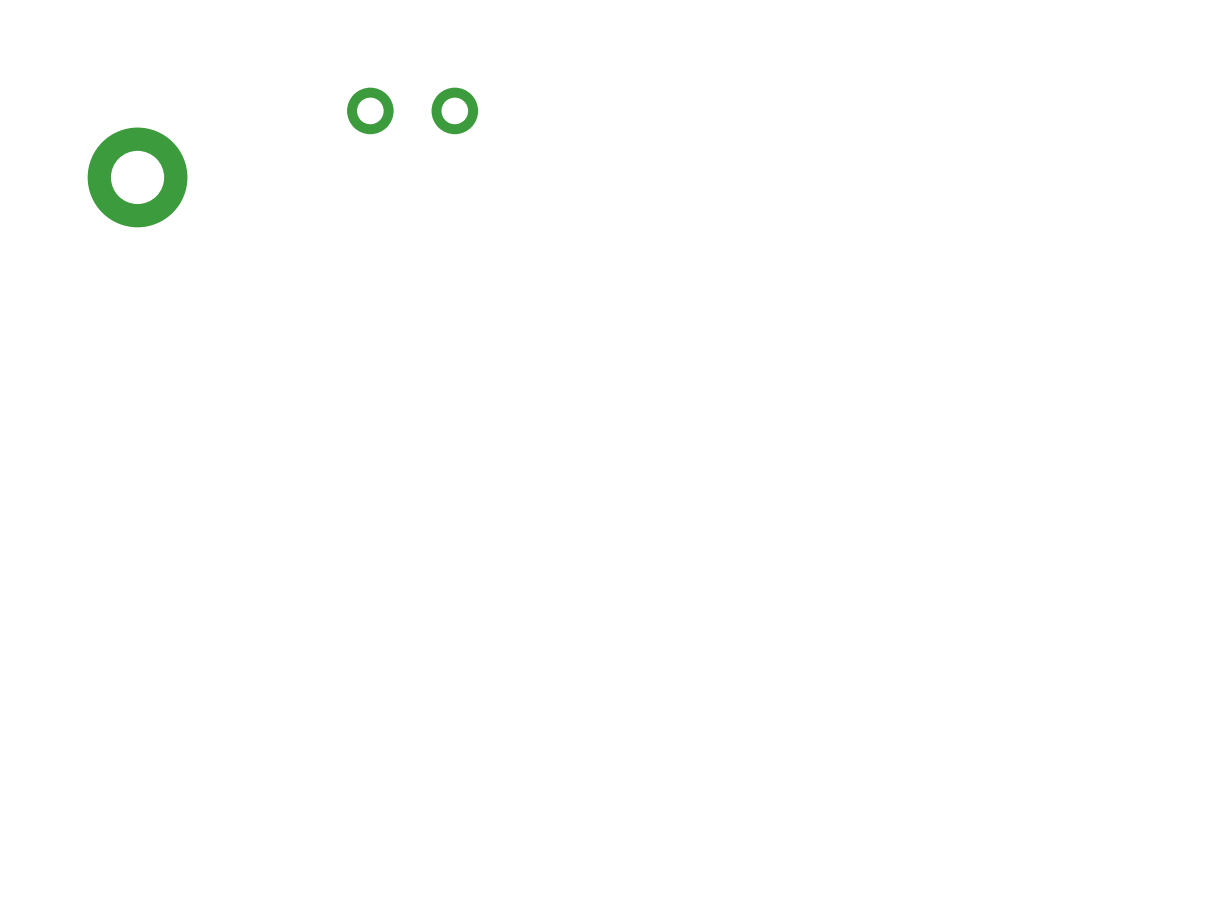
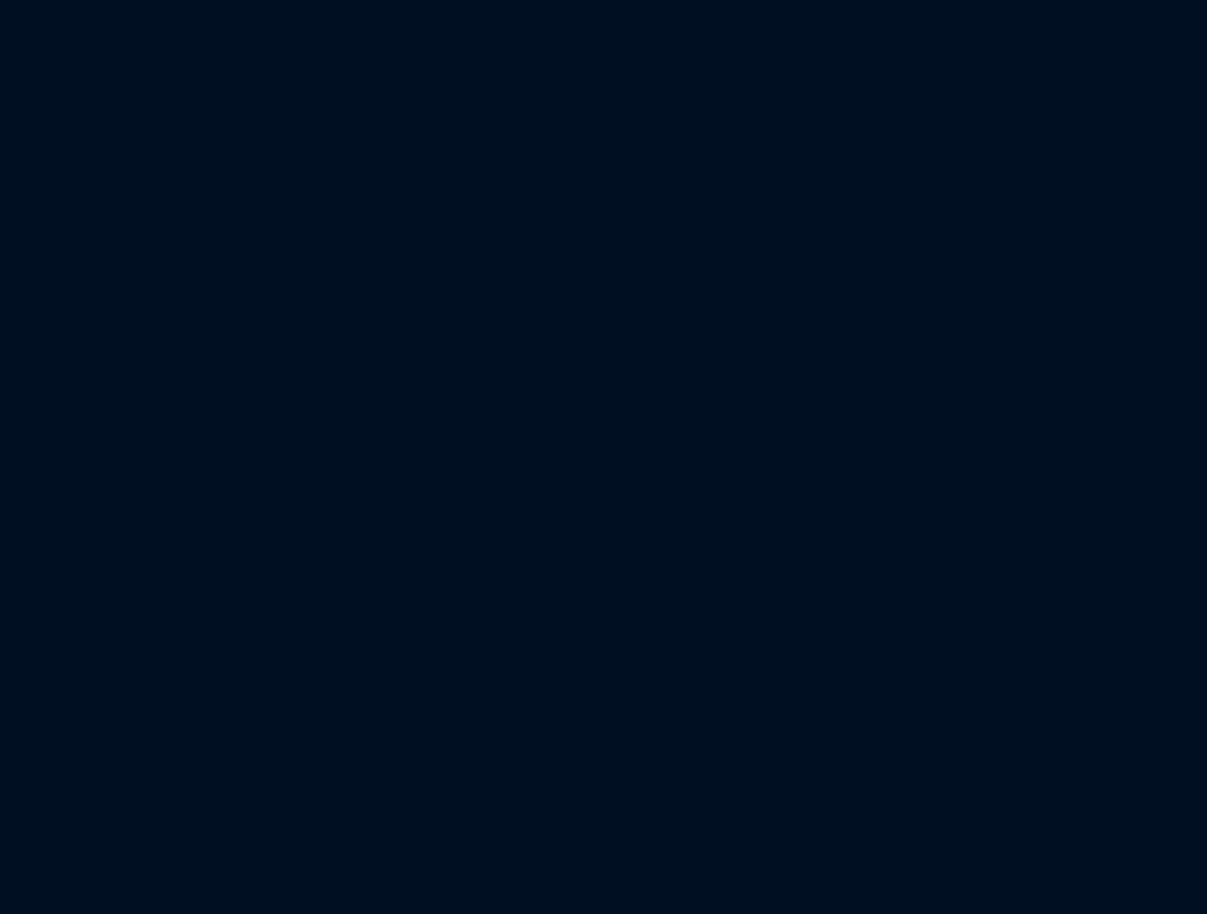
part: (412, 110) -> none
part: (137, 177) -> none

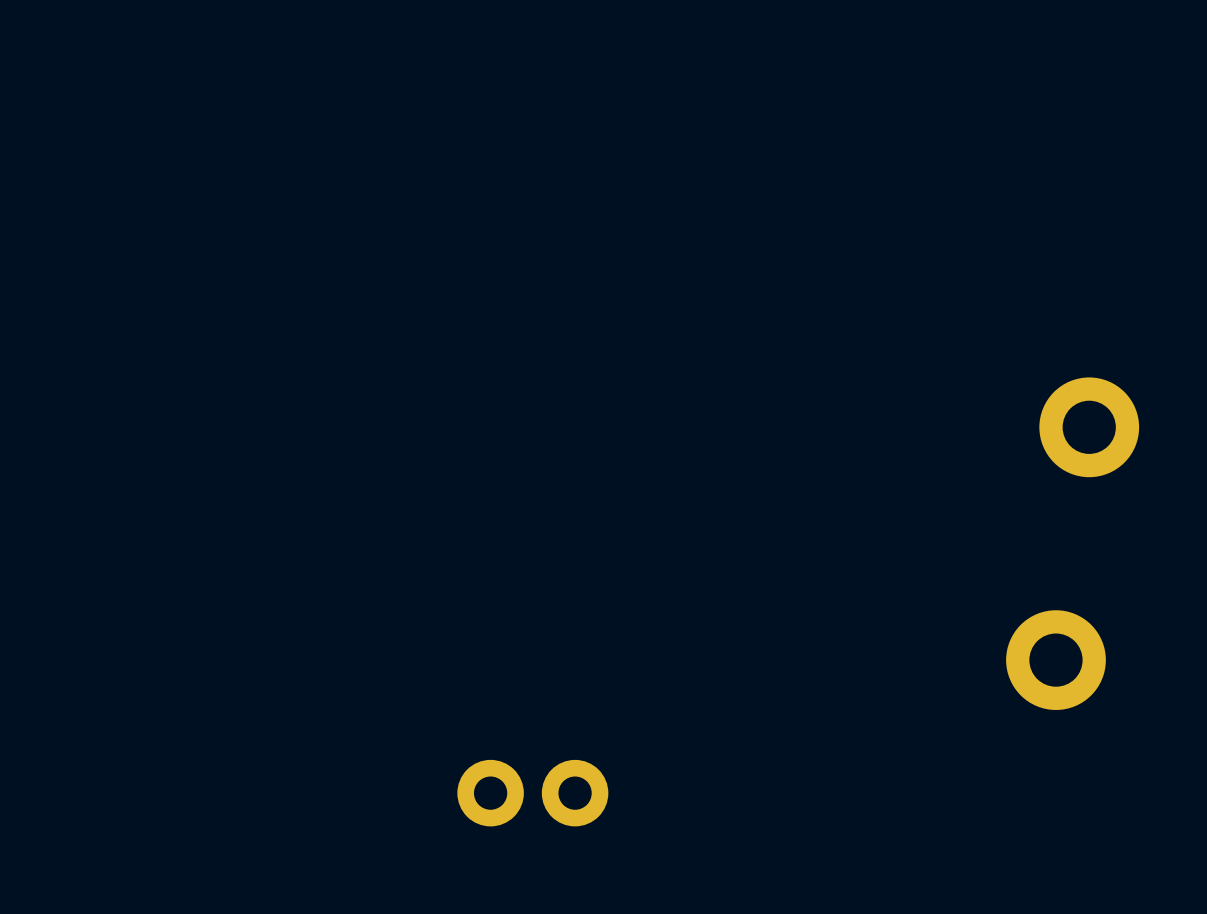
part: none -> (1089, 427)
part: none -> (1055, 660)
part: none -> (532, 793)

